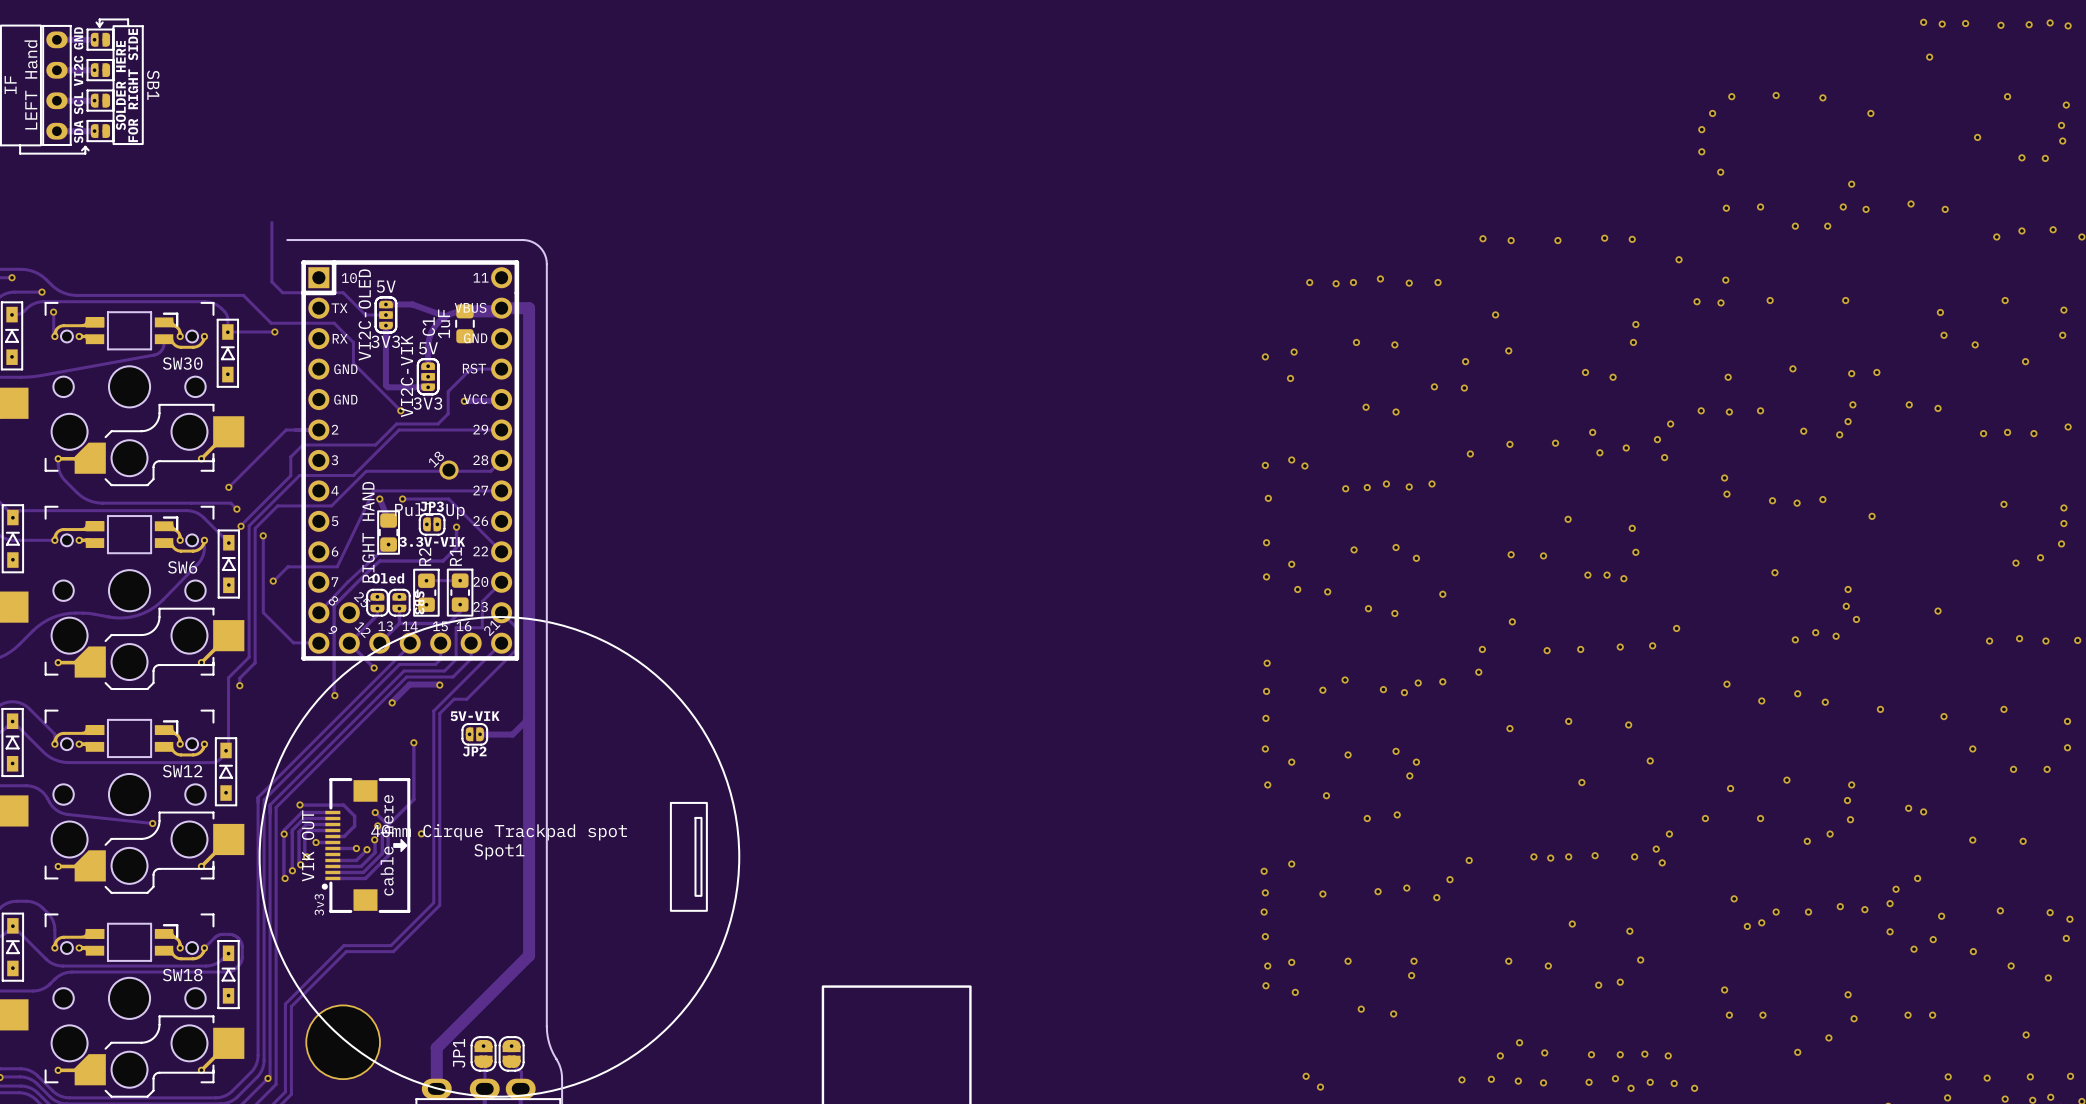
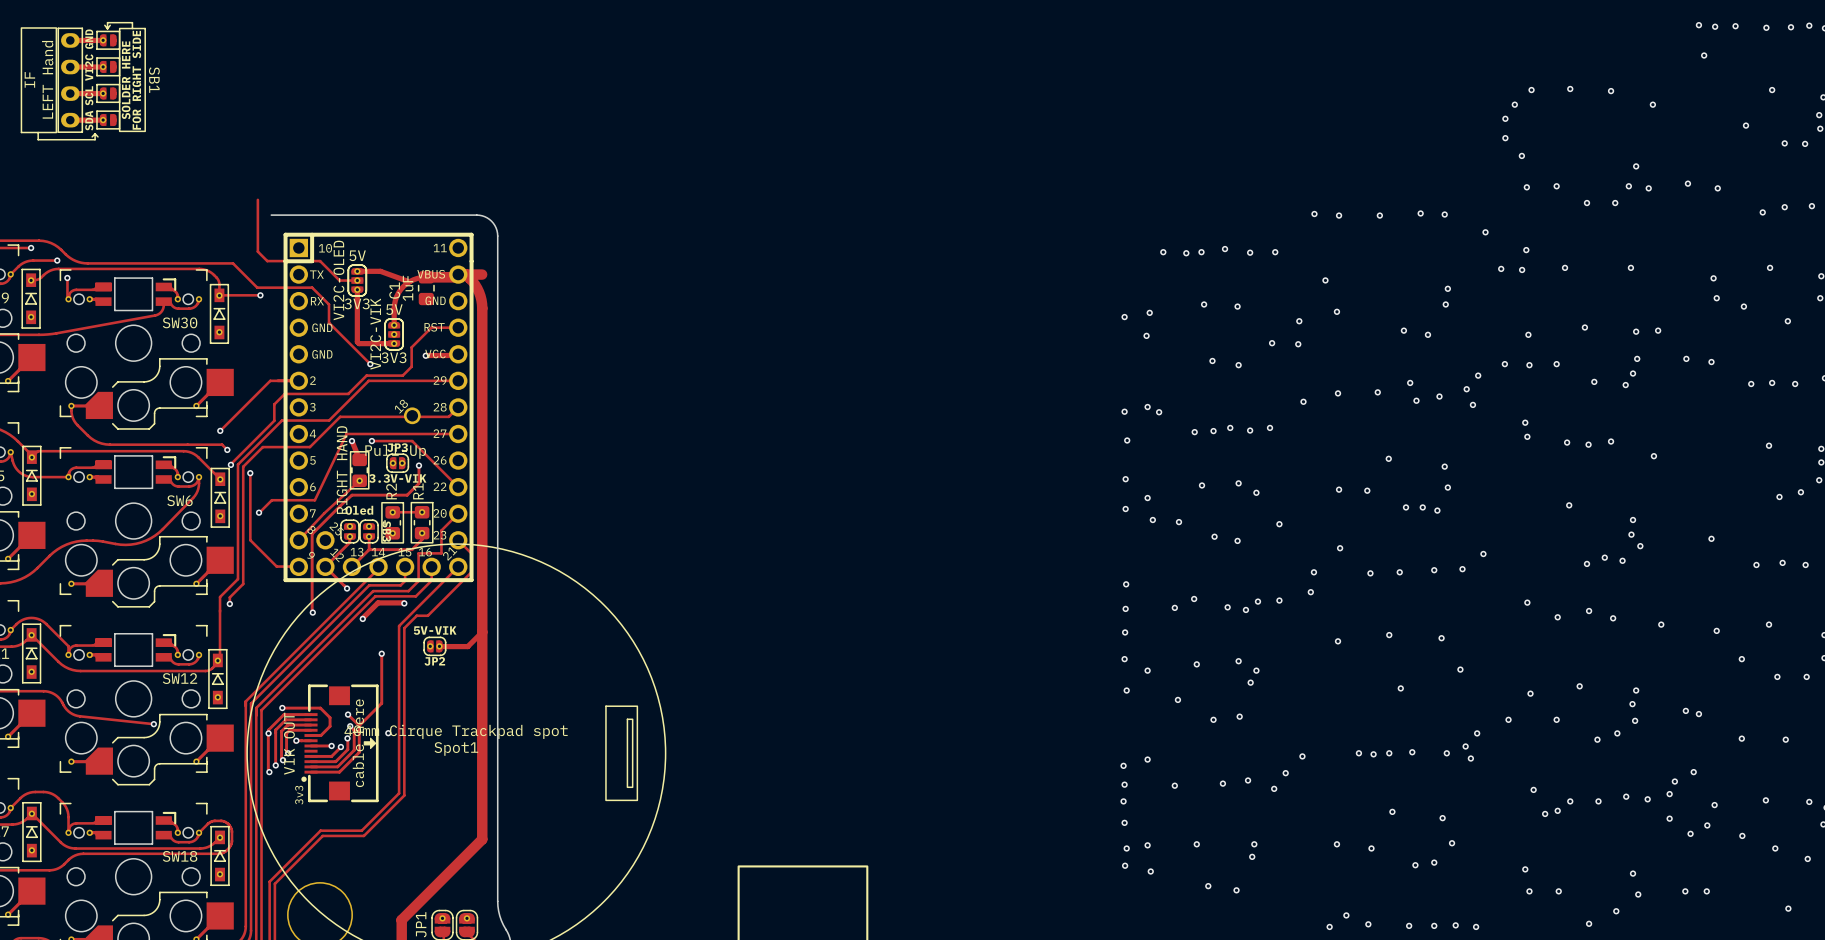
track: (529, 308) (529, 346) -> (465, 274) (477, 288) (482, 308)

